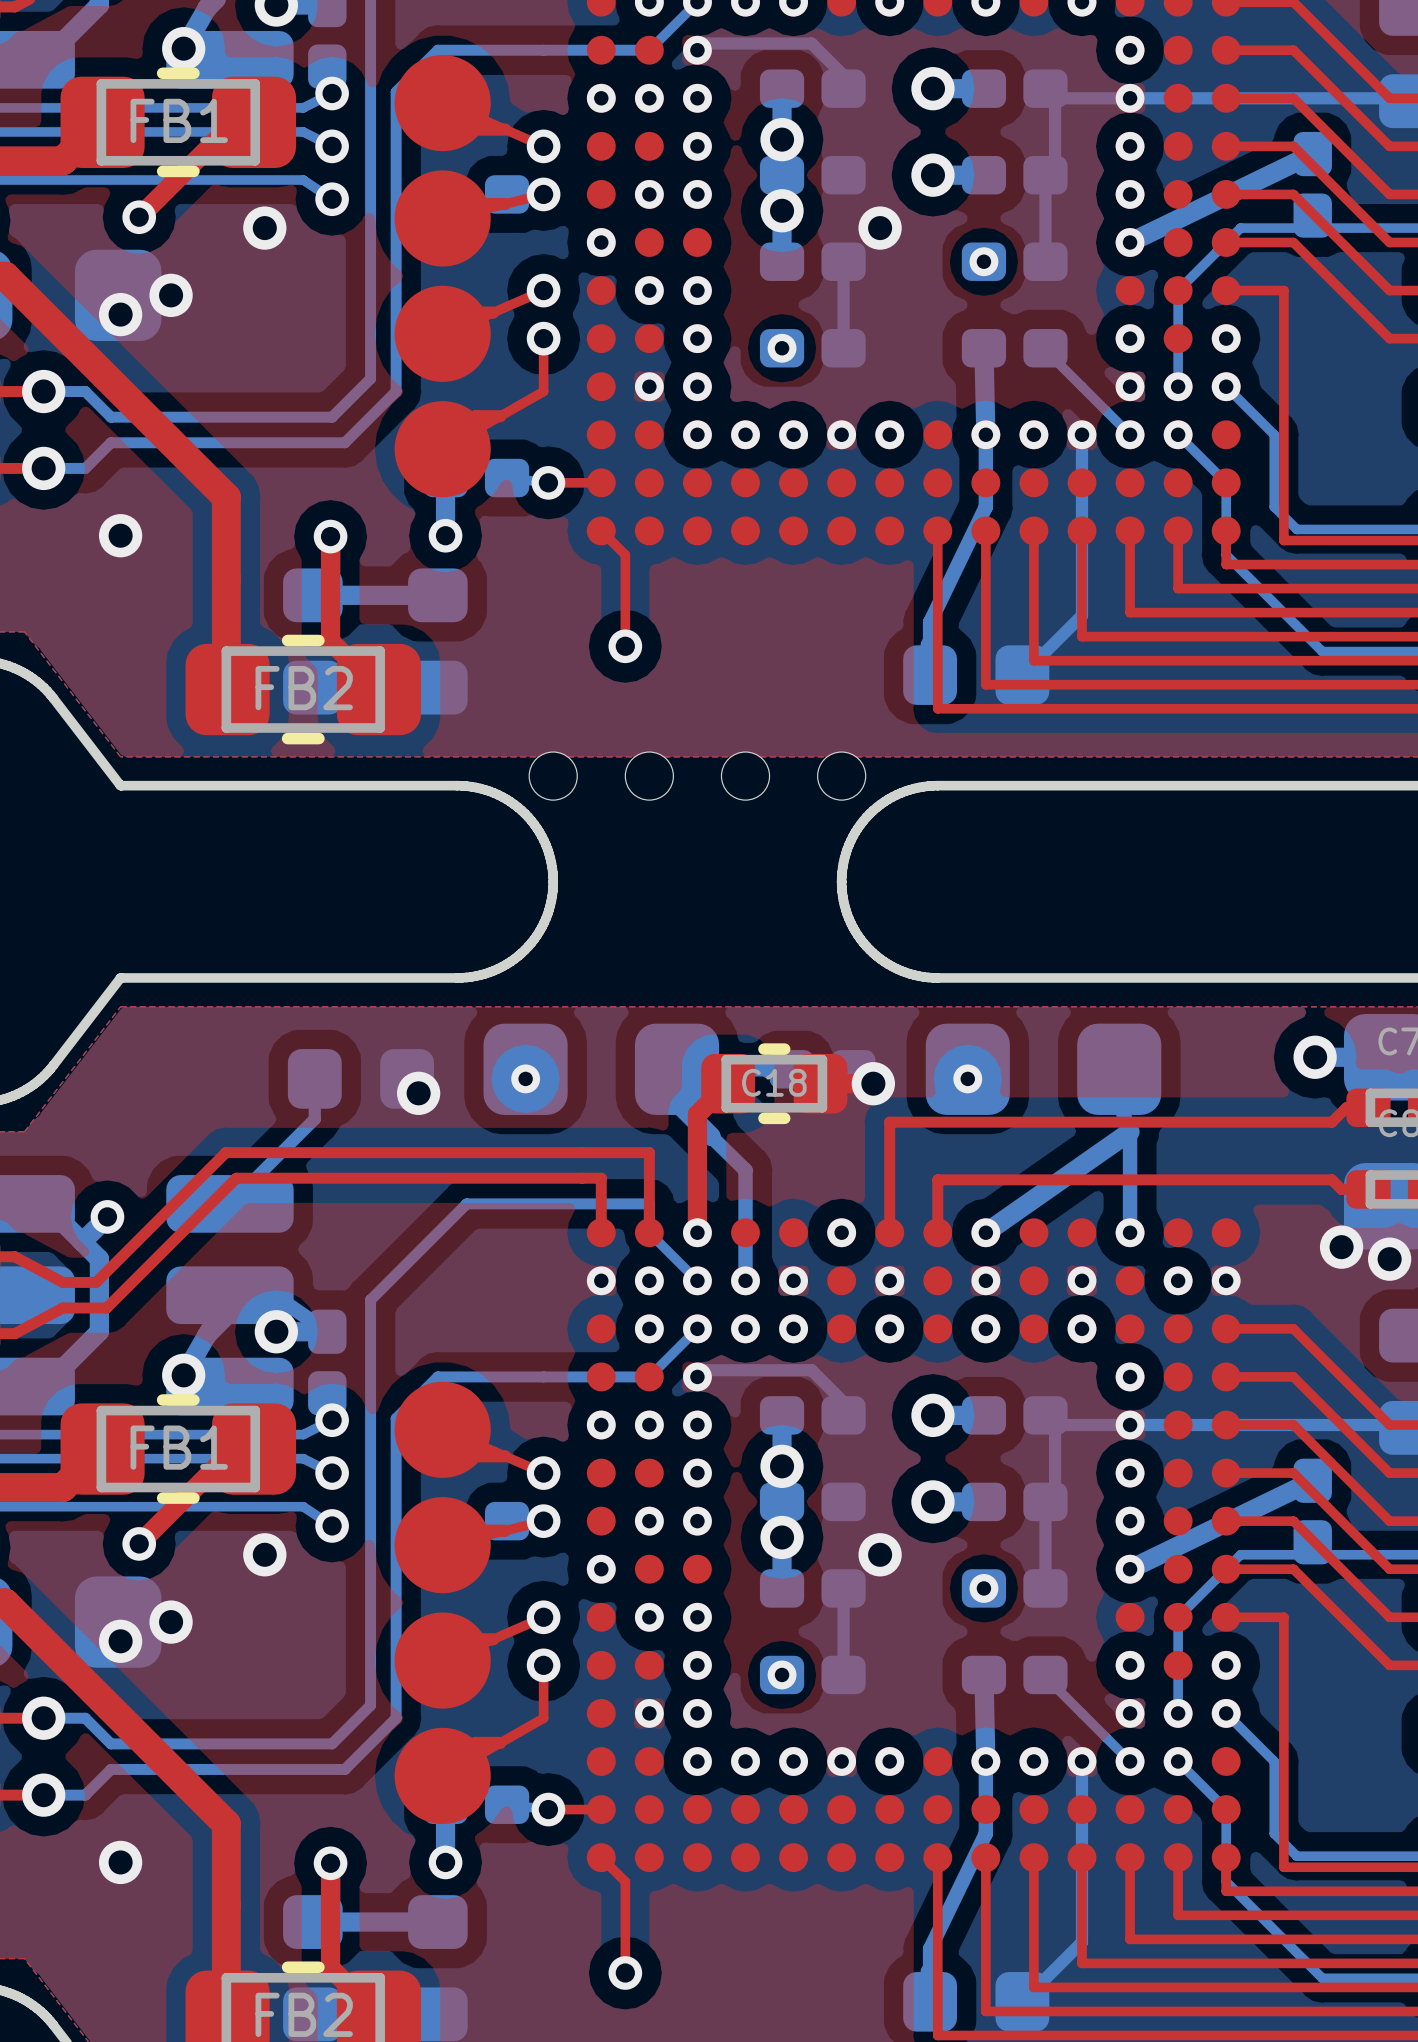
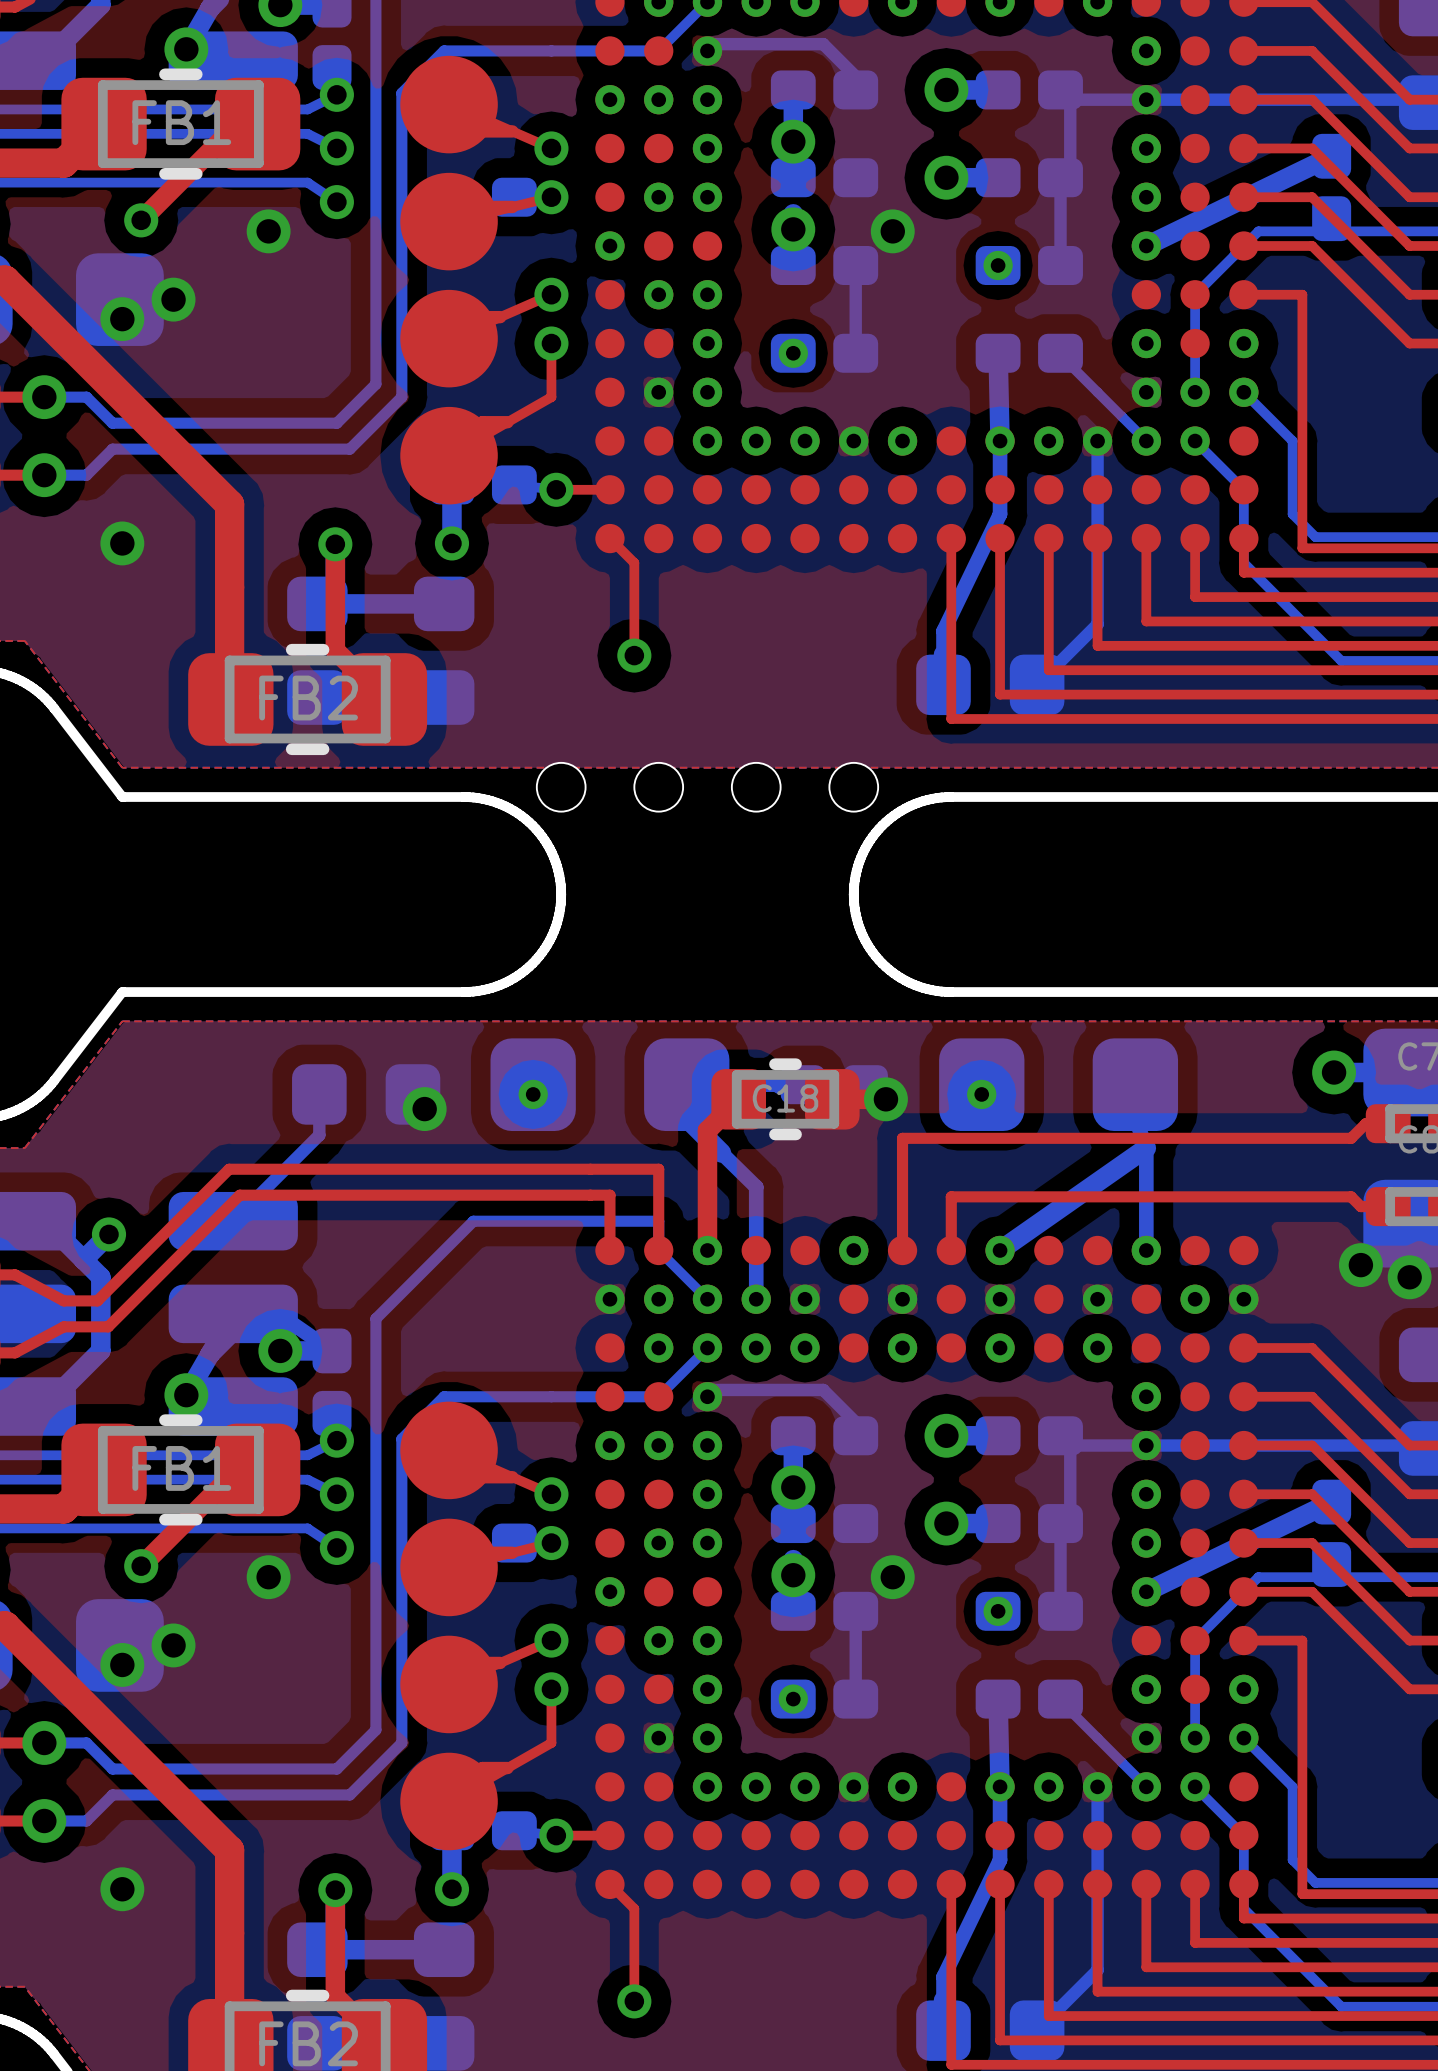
via position: (782, 210) -> (793, 229)
via position: (782, 1537) -> (793, 1575)

